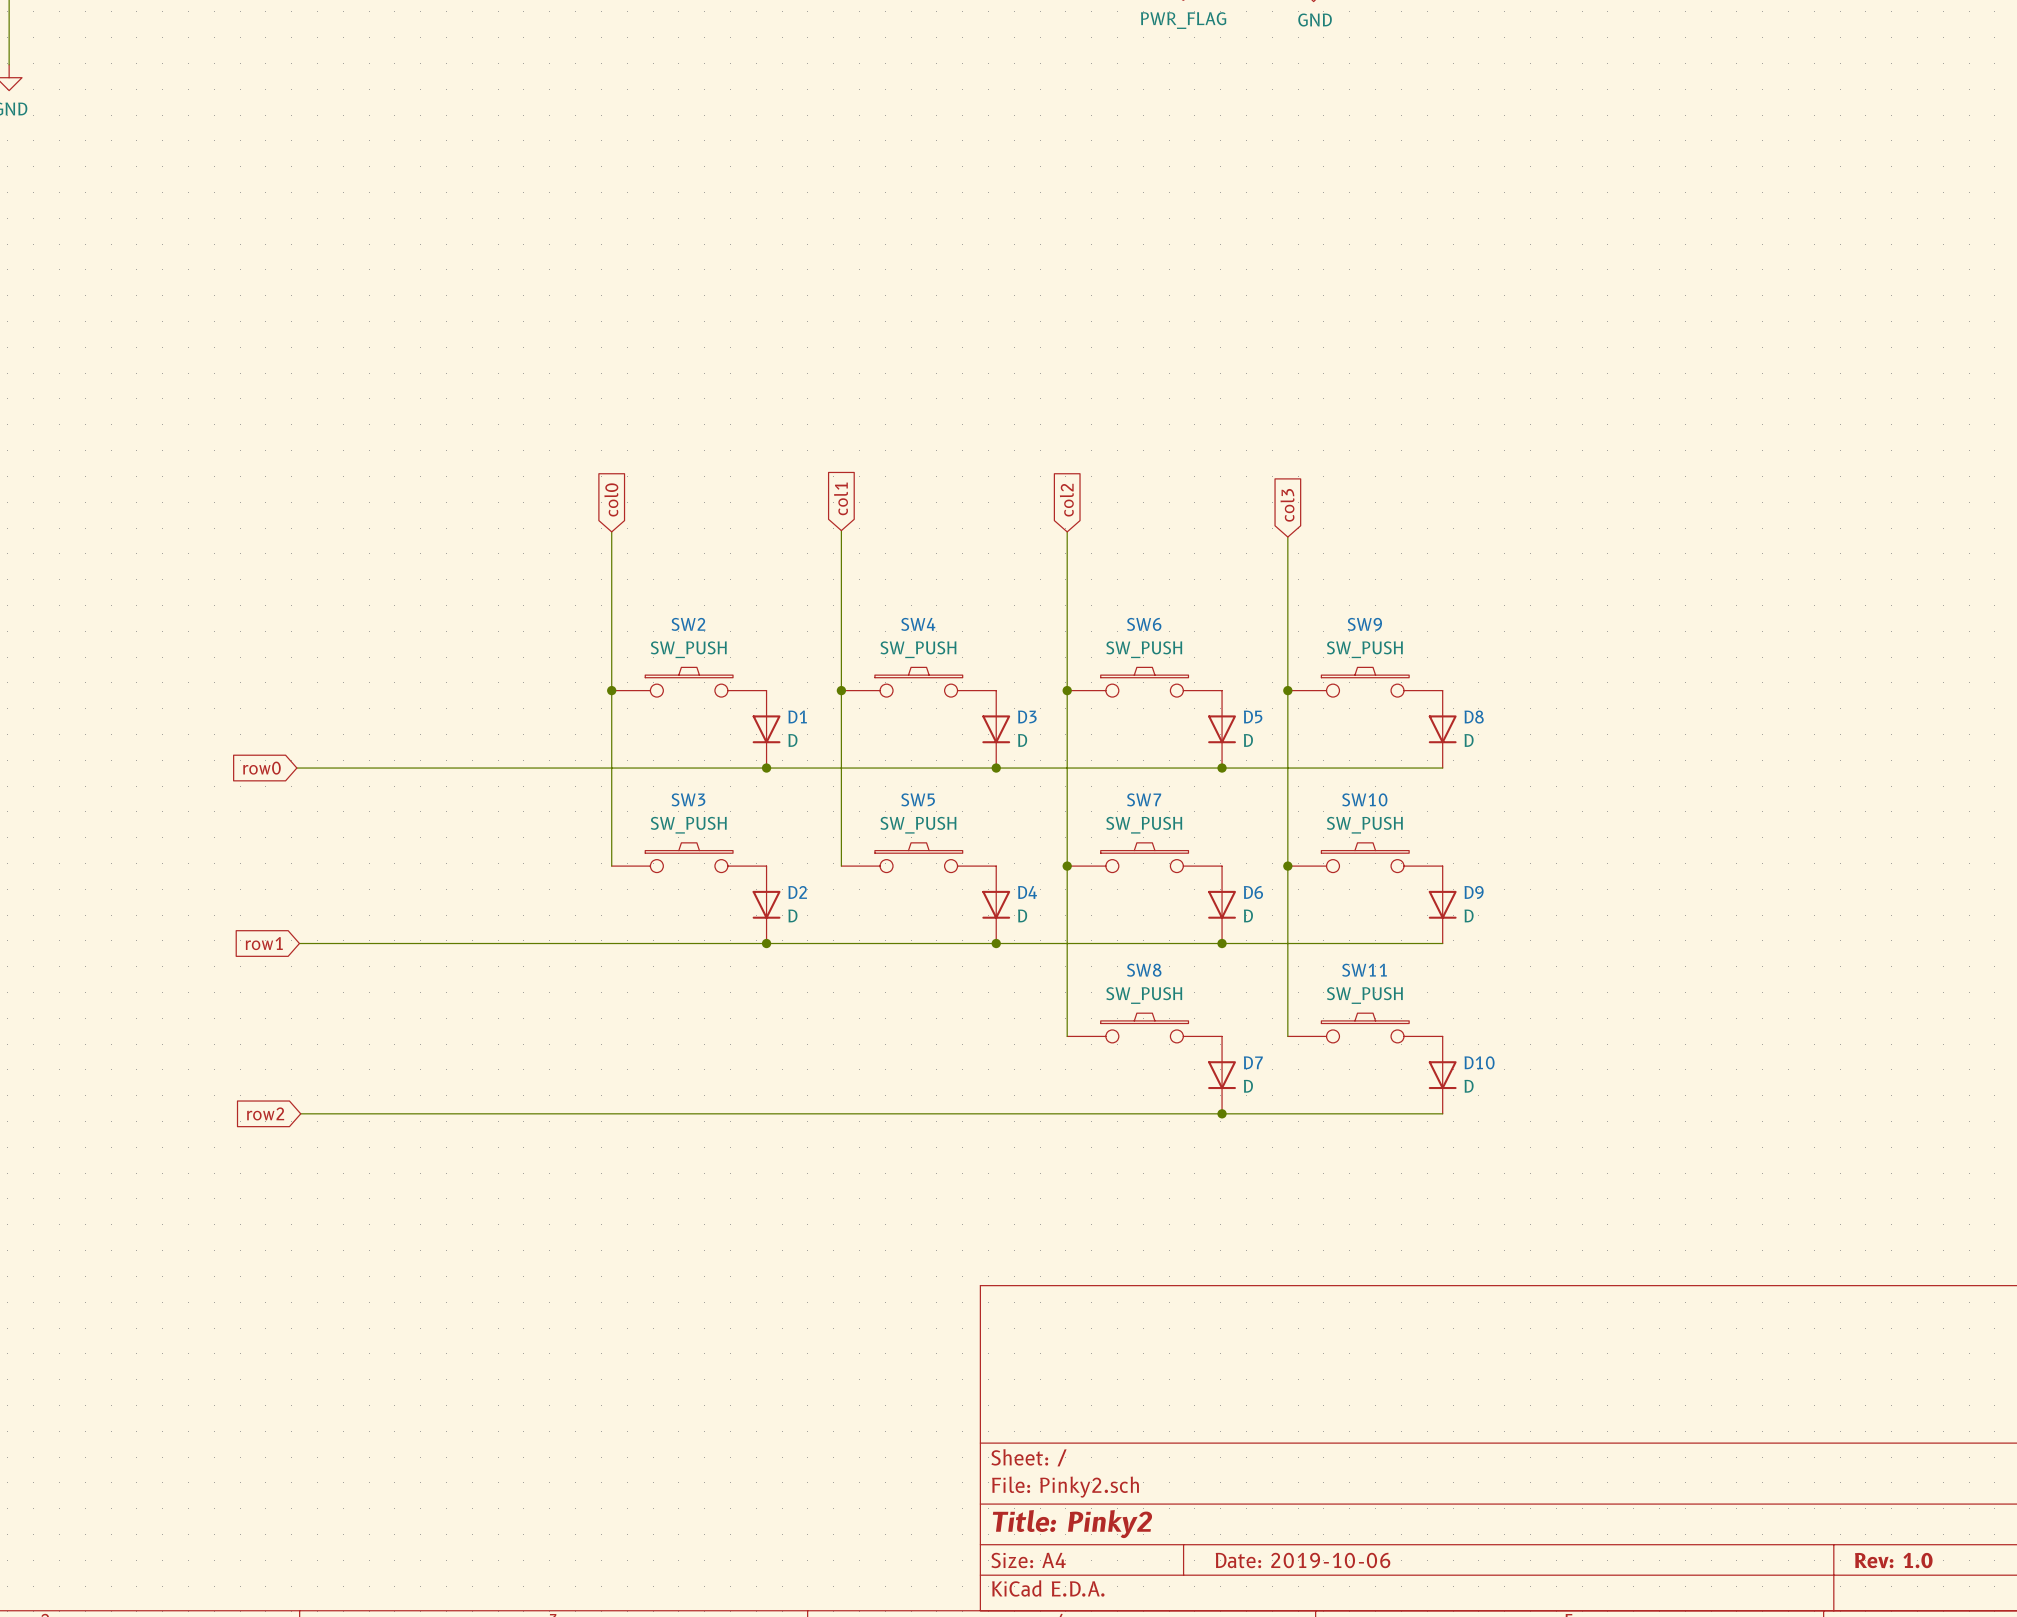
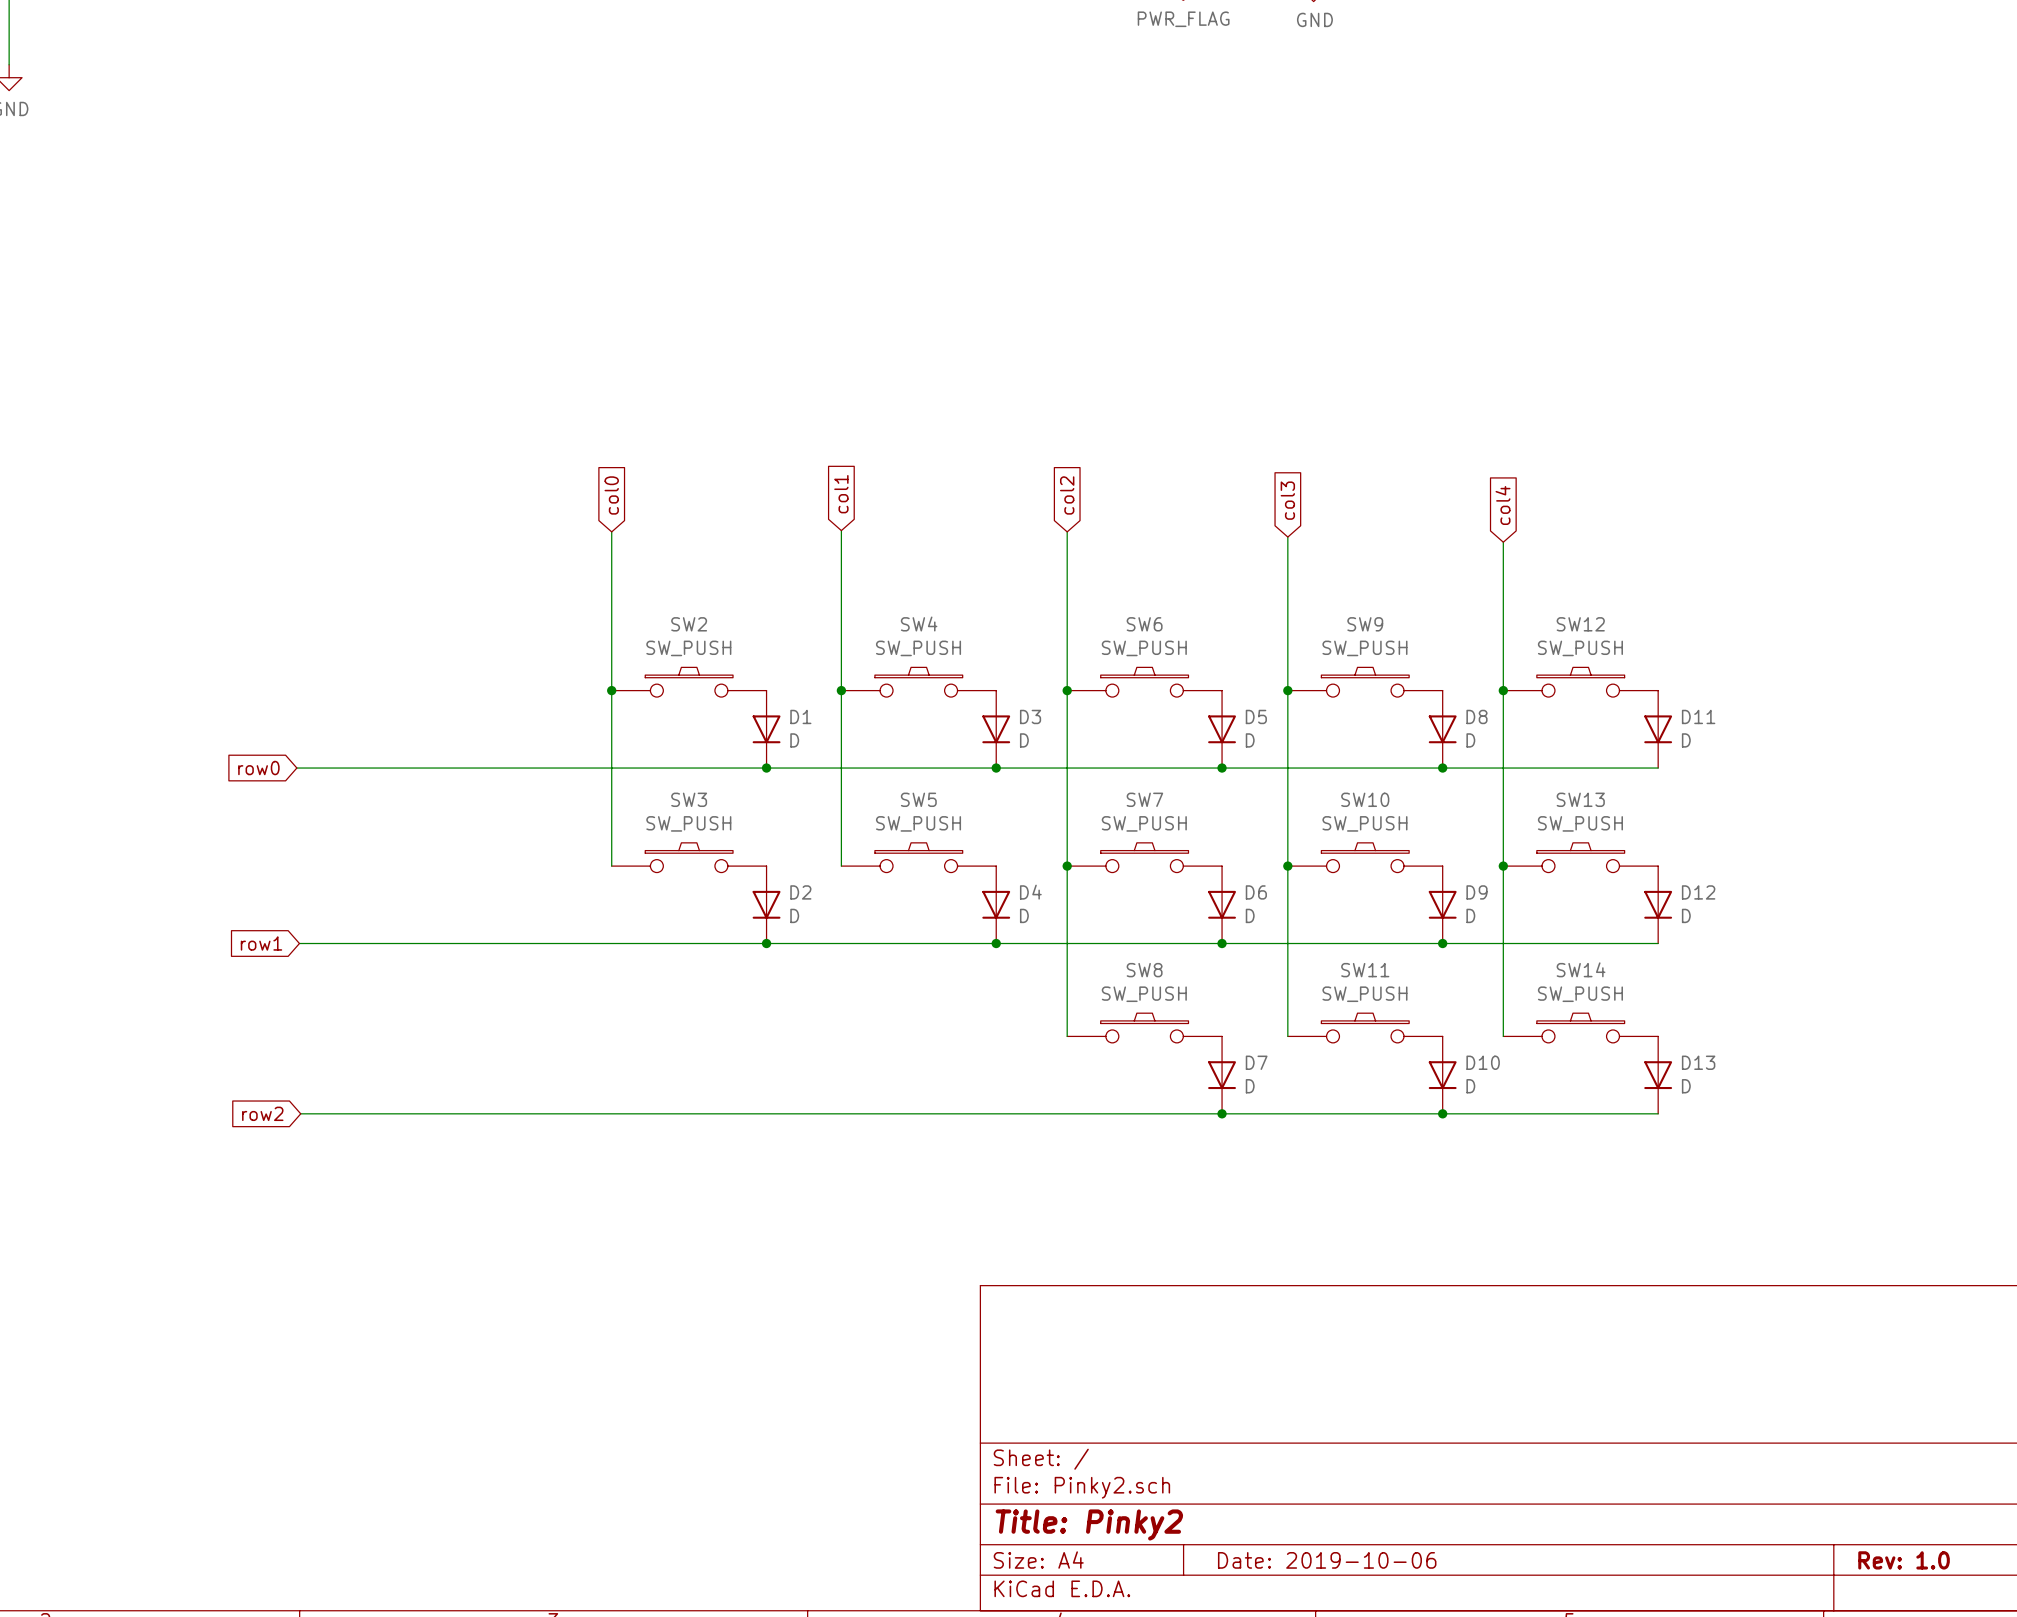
global label: none -> col4 (1503, 505)
wire: none -> (1503, 542) (1503, 1036)
SW12: none -> SW_PUSH (1580, 682)
junction: none -> (1503, 690)
D11: none -> D (1658, 729)
wire: none -> (1442, 768) (1658, 768)
junction: none -> (1442, 768)
SW13: none -> SW_PUSH (1580, 857)
junction: none -> (1503, 866)
D12: none -> D (1658, 904)
wire: none -> (1442, 943) (1658, 943)
junction: none -> (1442, 943)
SW14: none -> SW_PUSH (1580, 1028)
D13: none -> D (1658, 1075)
wire: none -> (1442, 1113) (1658, 1113)
junction: none -> (1442, 1113)

